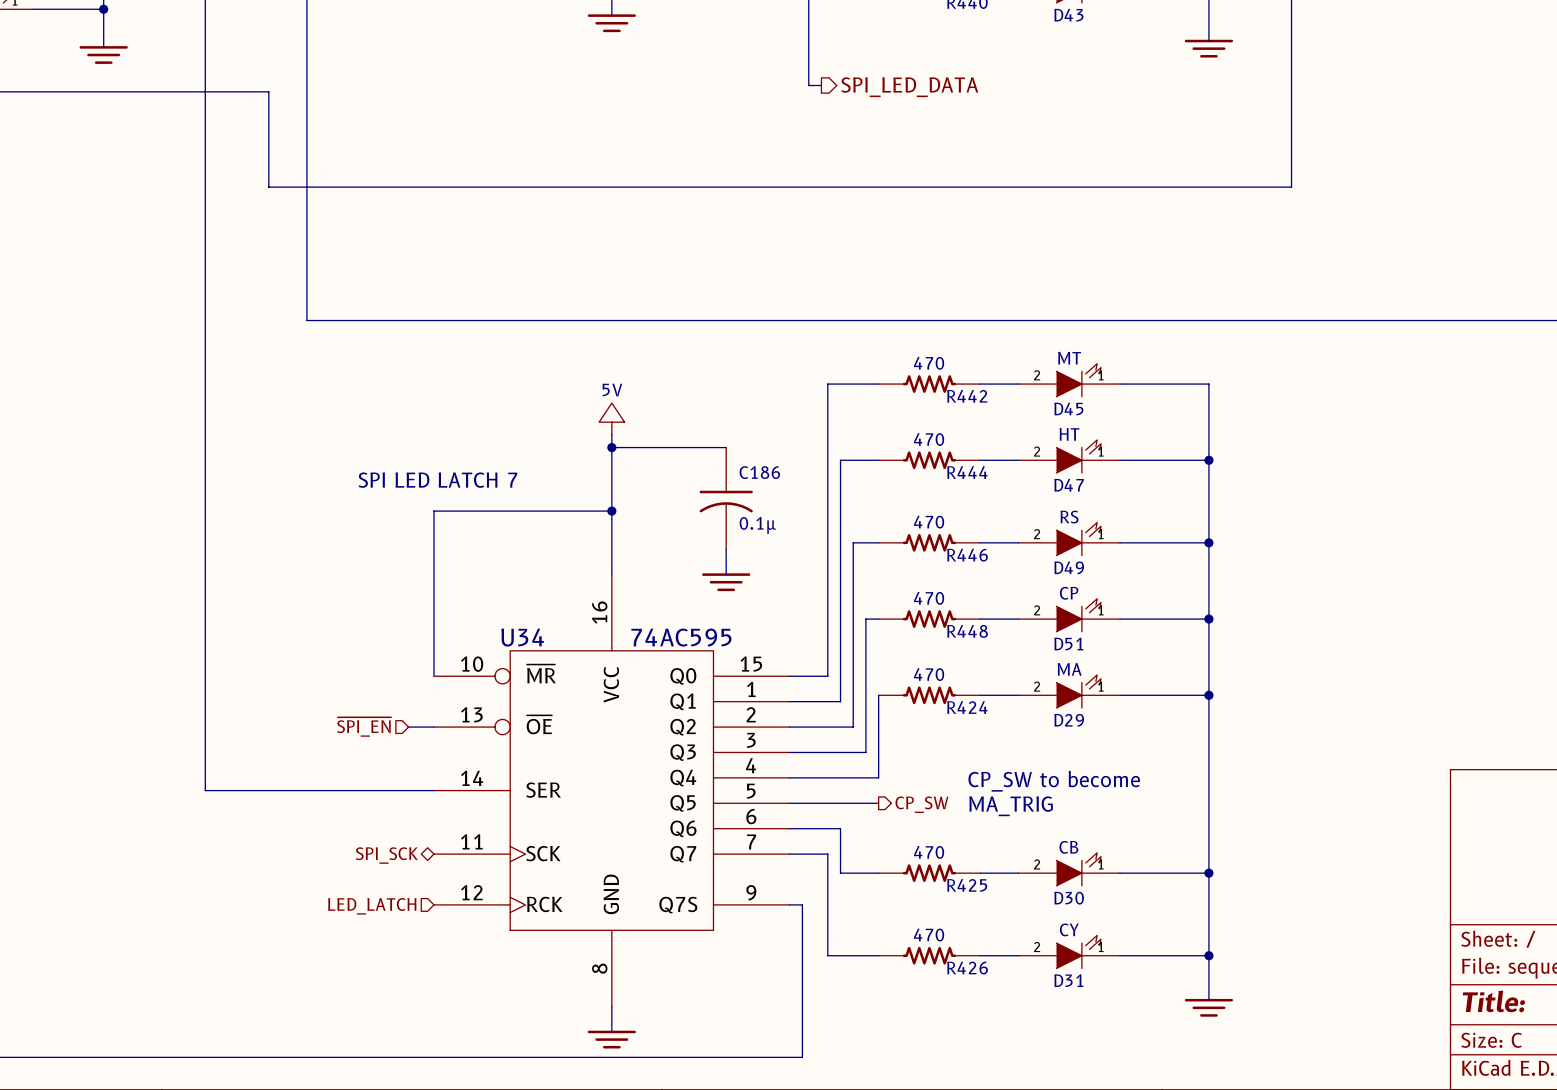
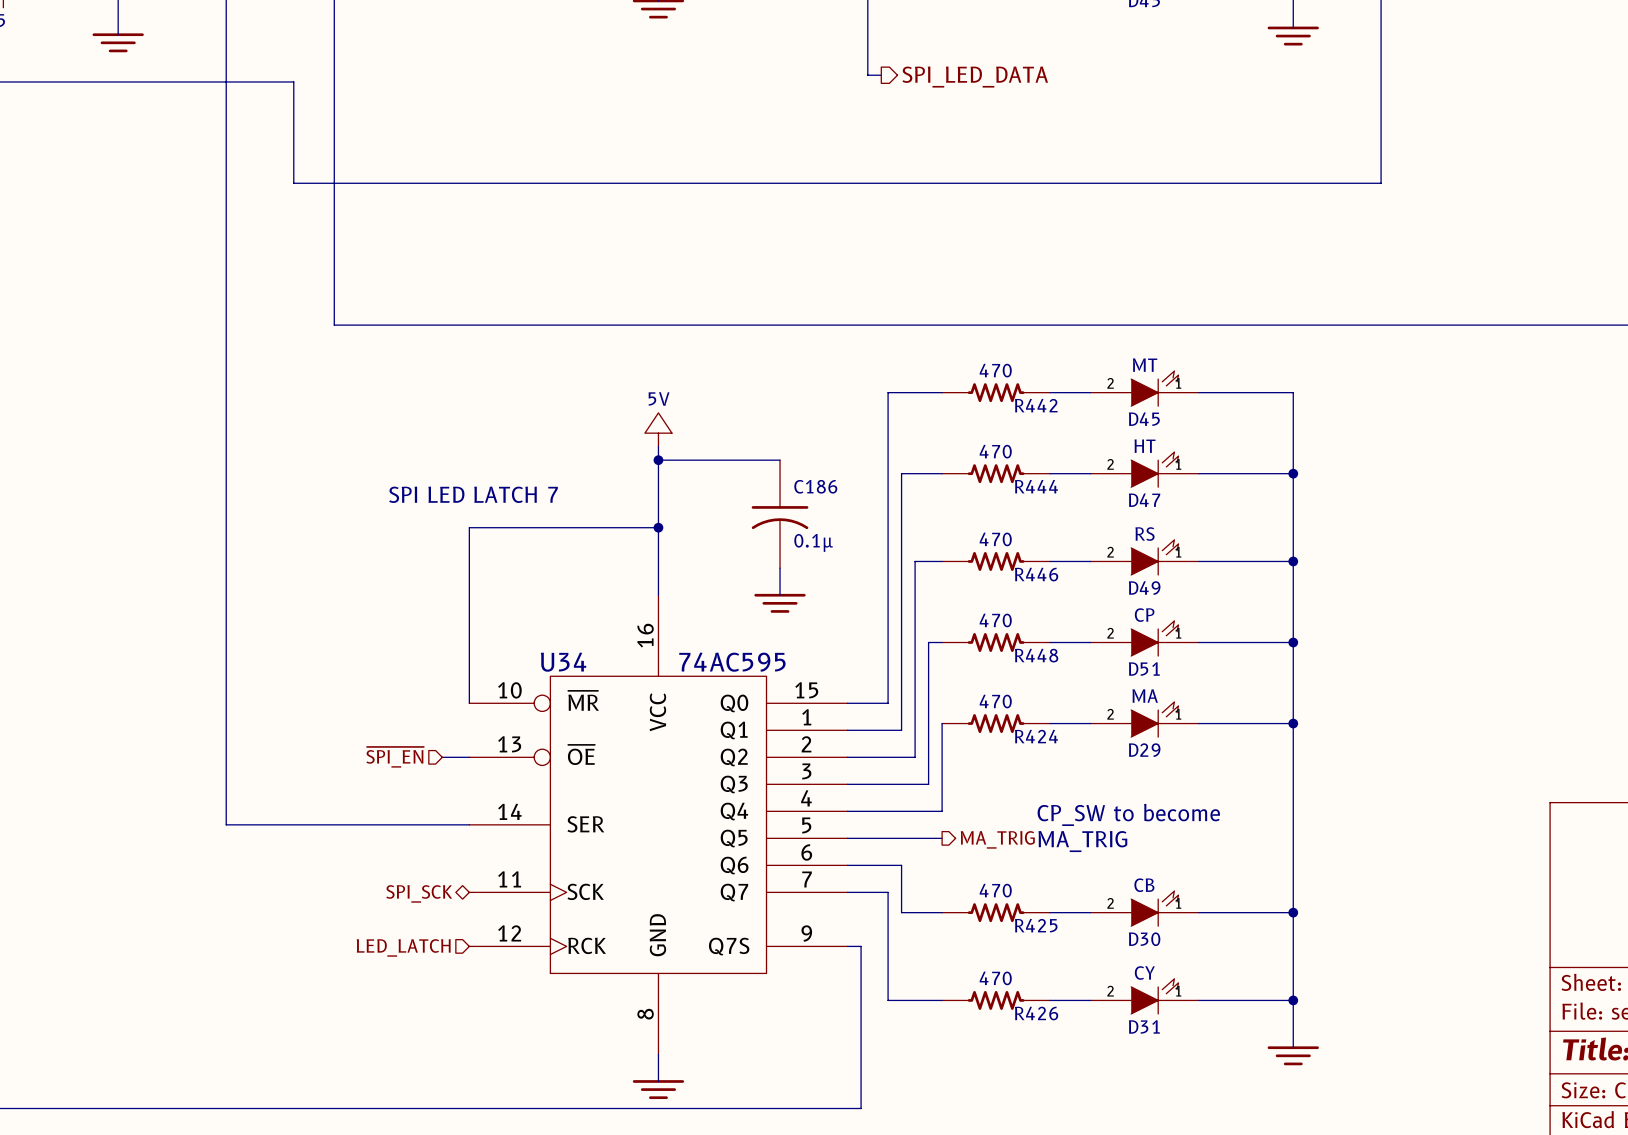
hierarchical label: CP_SW (921, 804) -> MA_TRIG (997, 839)

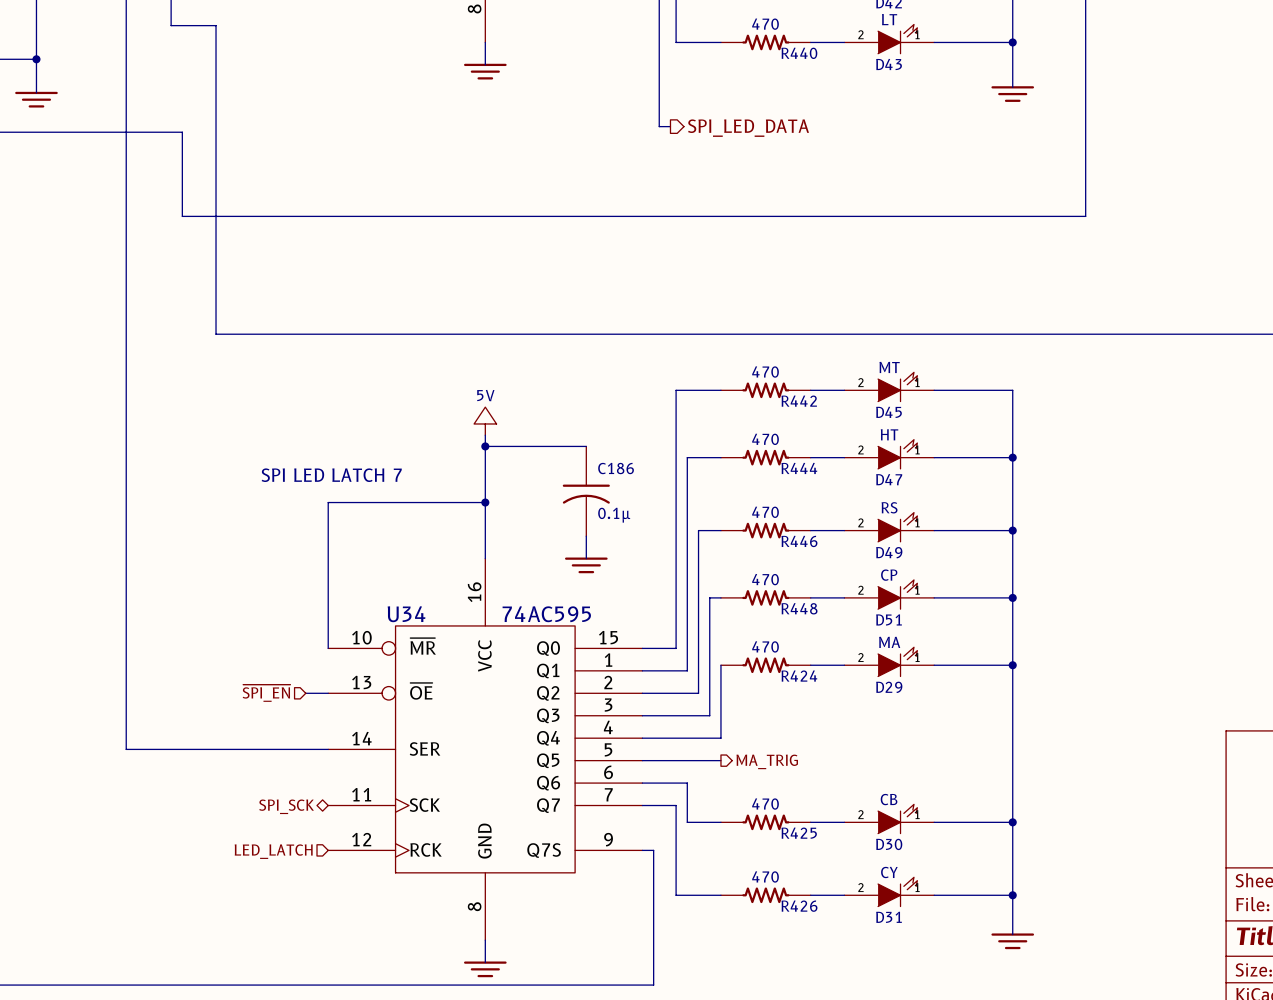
text: CP_SW to become (1128, 814) -> none
text: MA_TRIG (1082, 841) -> none

